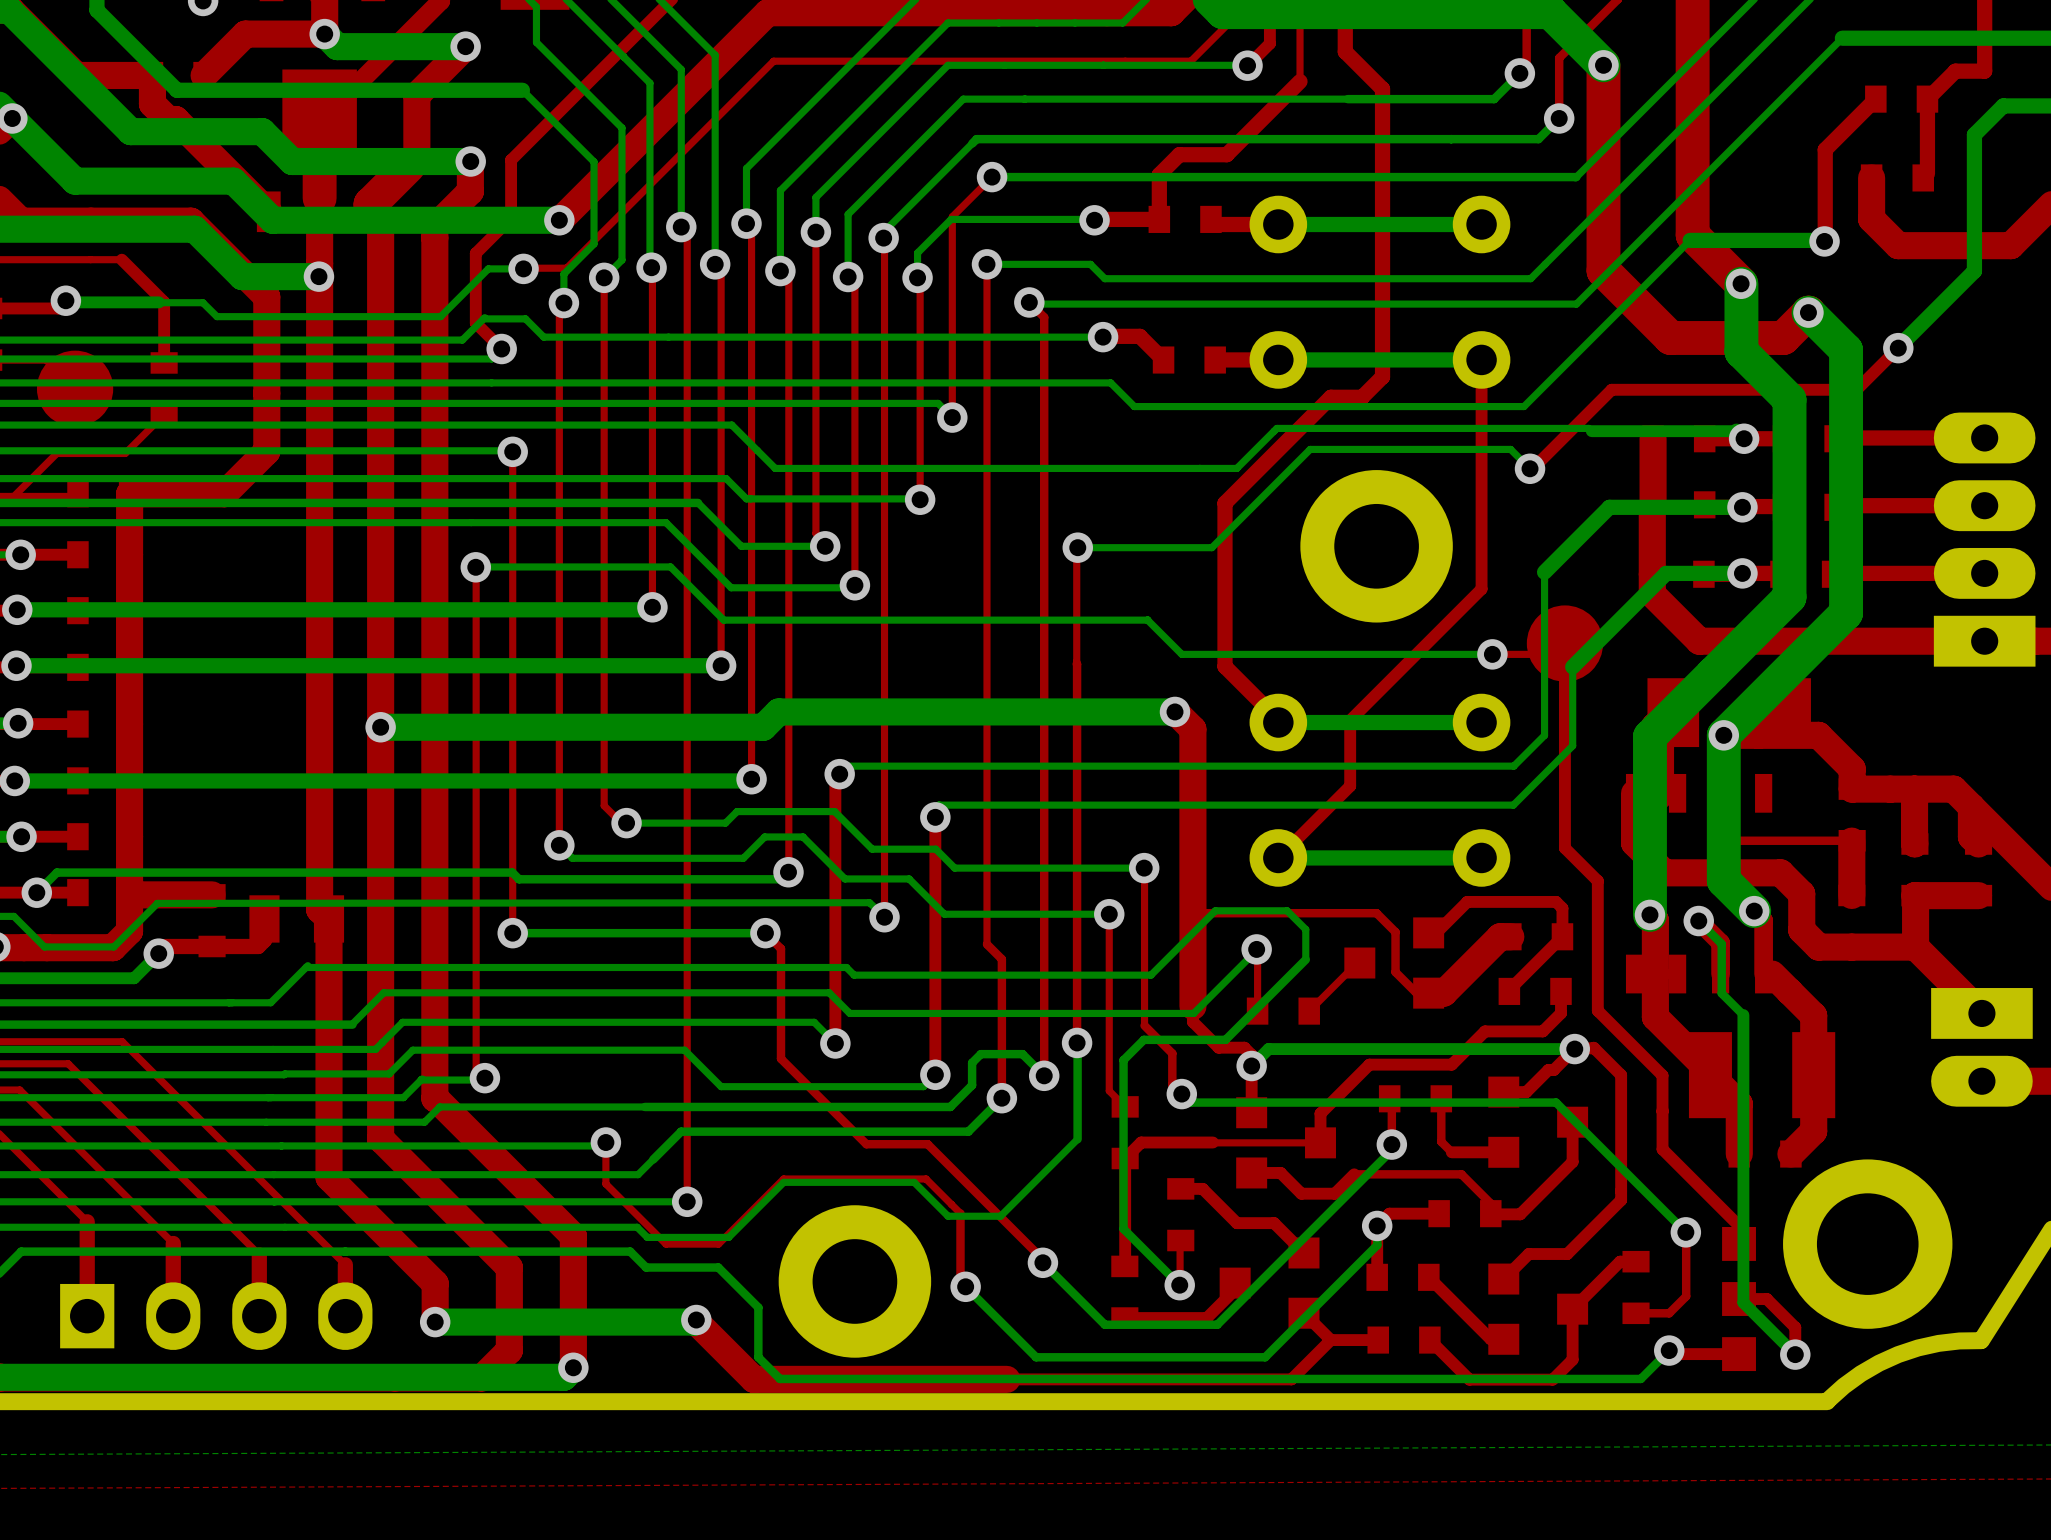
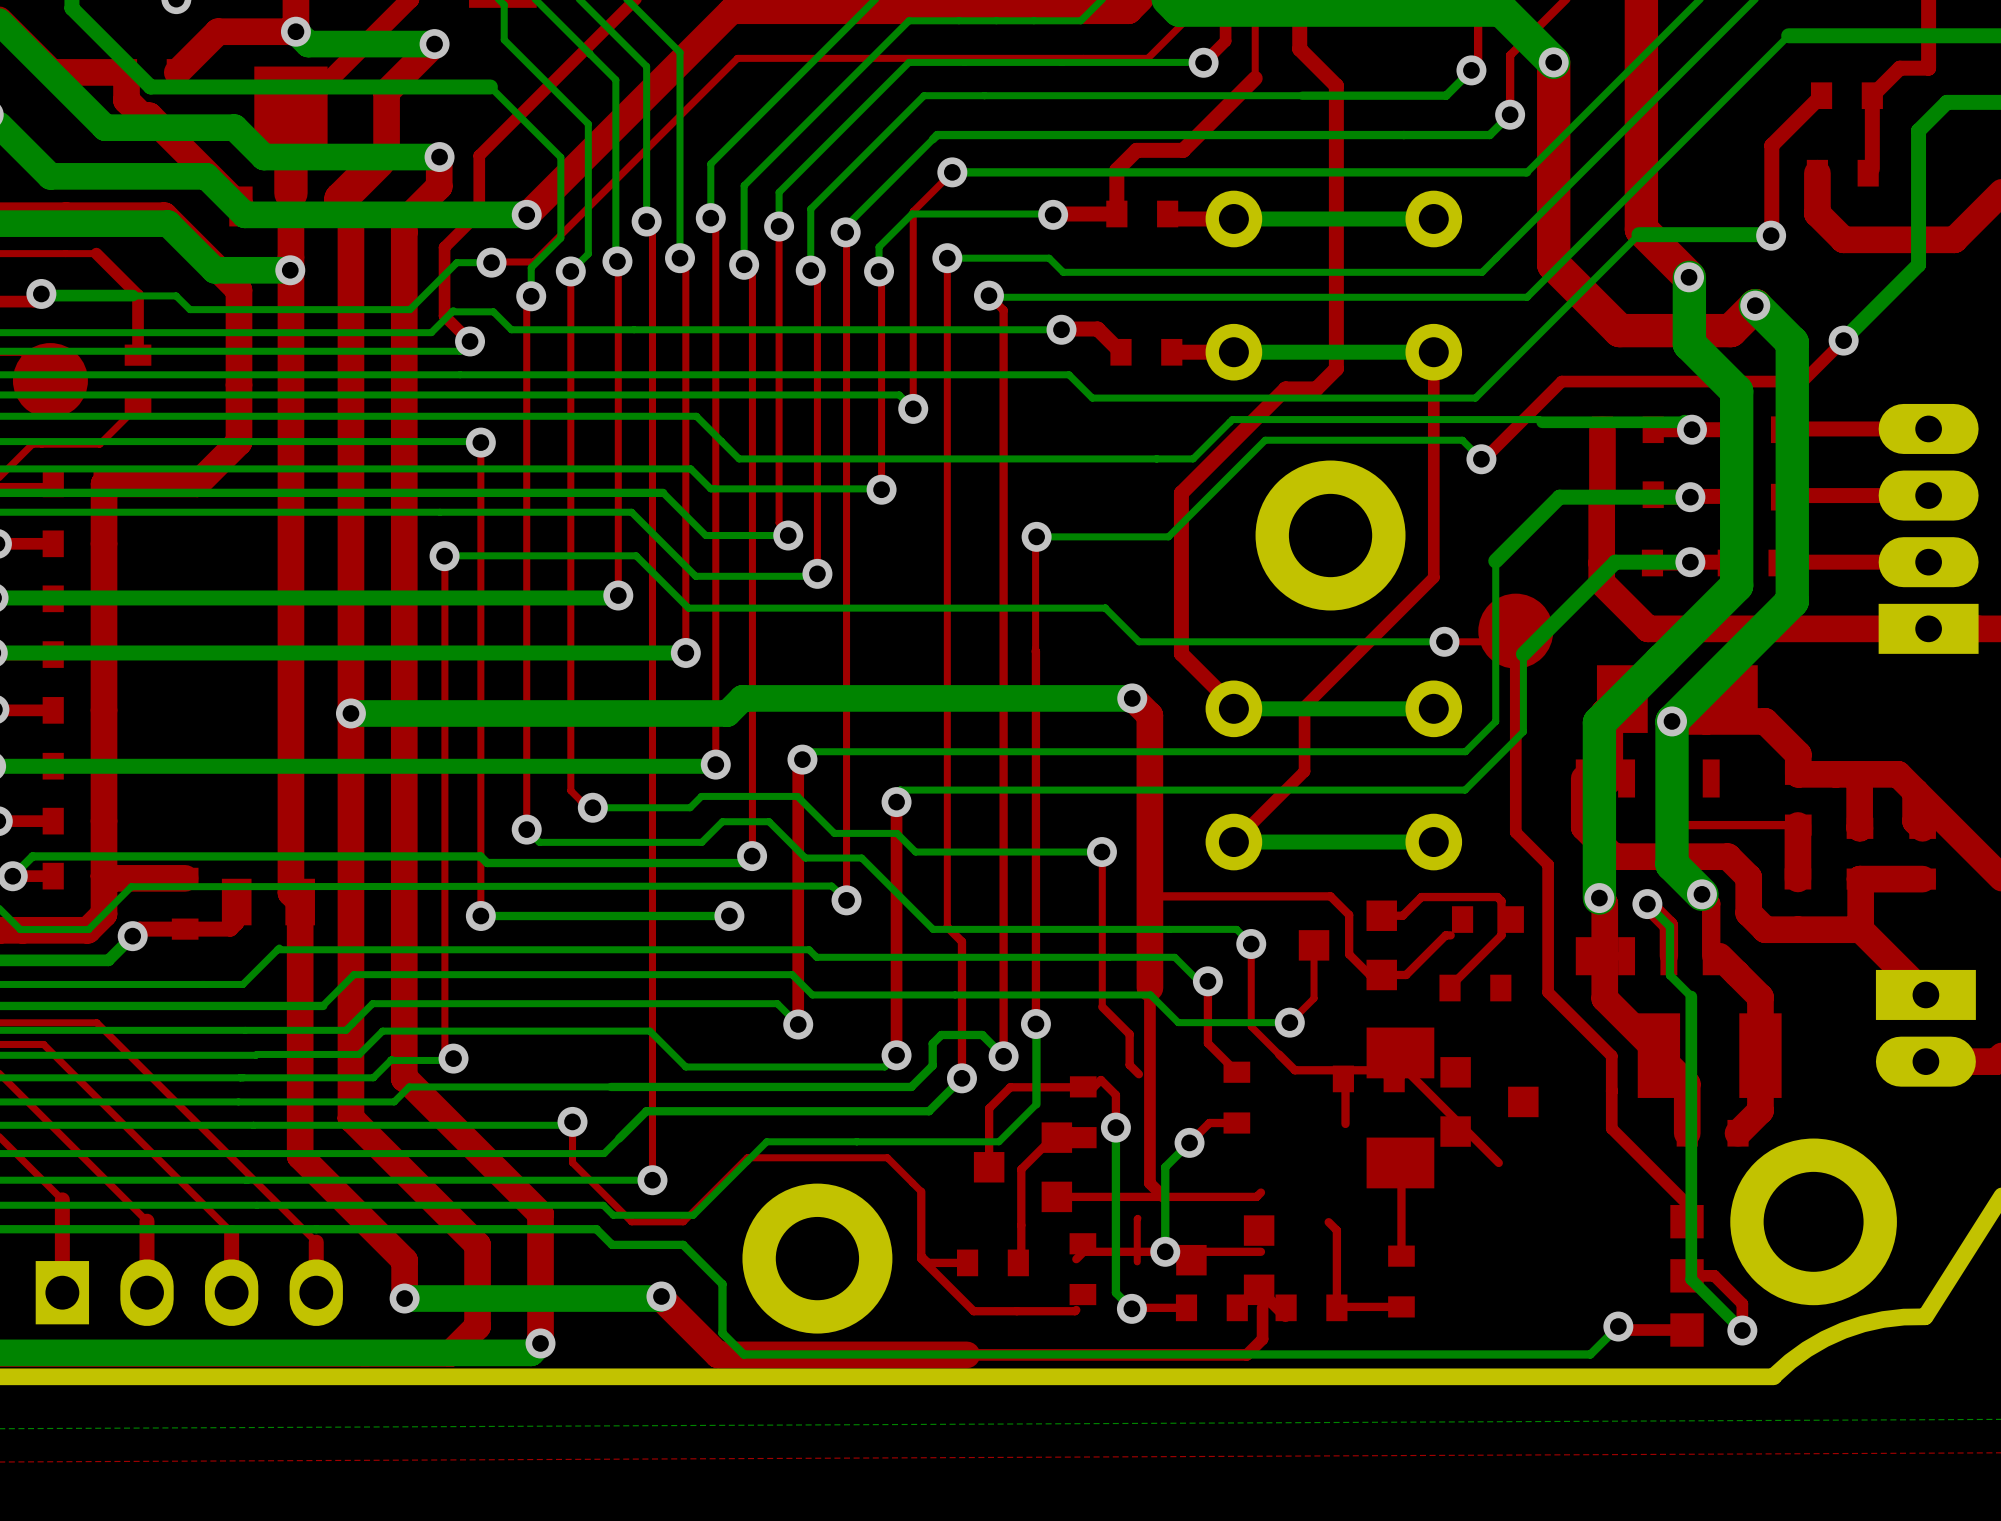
bottom track: (737, 858) (743, 858) (764, 836) (803, 836) (845, 878) (909, 878) (944, 914) (1109, 914) -> (701, 842) (722, 821) (769, 821) (805, 858) (861, 858) (933, 929) (1236, 929) (1251, 944)
top track: (1109, 914) (1109, 1090) (1125, 1106) -> none
via: (1109, 914) -> none
top track: none -> (1381, 915) (1402, 915) (1421, 897) (1497, 897) (1501, 901) (1501, 935) (1450, 988)
top track: (1436, 932) (1467, 901) (1556, 901) (1562, 908) (1562, 936) (1509, 991) -> none
top track: (765, 933) (781, 948) (781, 1058) (866, 1144) (927, 1144) (1042, 1259) (1042, 1262) -> none
top track: (1510, 936) (1500, 936) (1443, 993) -> (1450, 935) (1445, 935) (1406, 974) (1396, 974)
top track: (1256, 949) (1257, 1011) -> none
bottom track: (1256, 949) (1193, 1013) -> (1289, 1022) (1178, 1022) (1150, 994)
via: (1256, 949) -> none
top track: none -> (1251, 944) (1251, 1026) (1279, 1054)
via: none -> (1251, 944)
top track: (1357, 963) (1309, 1011) -> none
top track: none -> (1314, 945) (1314, 998) (1289, 1022)
bottom track: (1150, 975) (1215, 910) (1287, 910) (1305, 929) (1305, 959) (1225, 1039) (1143, 1039) (1123, 1060) (1123, 1228) (1179, 1285) -> (1108, 957) (1174, 957) (1198, 981) (1207, 981)
part position: (1535, 991) -> (1475, 988)
top track: (1560, 991) (1560, 1013) (1542, 1031) (1485, 1031) (1451, 1064) (1369, 1064) (1320, 1113) (1320, 1142) (1213, 1142) -> none
top track: none -> (1207, 981) (1207, 1043) (1236, 1072)
via: none -> (1207, 981)
part: (1283, 1011) -> none
top track: (1192, 1021) (1218, 1047) (1244, 1047) (1251, 1054) (1251, 1112) -> (1149, 1003) (1149, 1183) (1163, 1196)
via: none -> (1289, 1022)
top track: (1593, 1047) (1621, 1075) (1621, 1200) (1567, 1254) (1528, 1254) (1503, 1279) -> none
top track: (1594, 1048) (1575, 1048) (1553, 1070) (1548, 1070) (1526, 1092) (1503, 1092) -> none
bottom track: (1574, 1049) (1268, 1049) (1251, 1066) -> none
via: (1574, 1049) -> none
via: (1251, 1066) -> none
top track: none -> (1400, 1052) (1400, 1064) (1498, 1162)
top track: none -> (1400, 1052) (1383, 1070) (1294, 1070) (1279, 1054)
bottom track: (1181, 1094) (1190, 1102) (1556, 1102) (1685, 1232) -> none
via: (1181, 1094) -> none
part footprint: [1236, 1097, 1336, 1189] -> [1223, 1061, 1251, 1134]
top track: (1441, 1098) (1441, 1141) (1451, 1152) (1503, 1152) -> none
top track: (1572, 1122) (1572, 1161) (1520, 1214) (1491, 1214) (1490, 1203) (1461, 1174) (1354, 1174) (1334, 1193) (1301, 1193) (1280, 1172) (1251, 1172) -> none
bottom track: (1077, 1124) (1077, 1139) (1000, 1216) (948, 1216) (914, 1182) (783, 1182) -> (1036, 1104) (998, 1141) (766, 1141) (747, 1161)
part: none -> (1400, 1107)
top track: (1212, 1142) (1141, 1142) (1125, 1158) (1125, 1266) -> none
top track: none -> (1236, 1123) (1209, 1123) (1189, 1142)
bottom track: (1391, 1144) (1391, 1150) (1217, 1324) (1104, 1324) (1042, 1262) -> none
via: (1391, 1144) -> none
top track: none -> (1115, 1127) (1115, 1094) (1100, 1080) (1093, 1087) (1010, 1087) (989, 1108) (989, 1167)
bottom track: none -> (1115, 1127) (1115, 1292) (1131, 1308)
via: none -> (1115, 1127)
top track: none -> (1056, 1137) (1052, 1137) (1021, 1169) (1021, 1259) (1018, 1262)
bottom track: none -> (1189, 1142) (1165, 1167) (1165, 1251)
via: none -> (1189, 1142)
top track: none -> (1402, 1145) (1400, 1162) (1401, 1256)
top track: (1180, 1188) (1202, 1188) (1236, 1223) (1274, 1223) (1303, 1252) -> none
top track: (1439, 1213) (1389, 1213) (1377, 1225) (1376, 1276) -> none
part: (1464, 1213) -> none
part: (1180, 1214) -> none
top track: none -> (1260, 1192) (1256, 1196) (1056, 1196)
bottom track: (1377, 1225) (1377, 1245) (1265, 1357) (1036, 1357) (965, 1286) -> none
via: (1377, 1225) -> none
via: (1685, 1232) -> none
top track: (1686, 1232) (1686, 1296) (1669, 1313) (1636, 1313) -> none
top track: none -> (1328, 1222) (1336, 1230) (1336, 1307) (1401, 1306)
top track: (1636, 1261) (1620, 1261) (1572, 1309) (1572, 1359) (1552, 1379) (1469, 1379) (1429, 1340) -> none
via: (1042, 1262) -> none
top track: none -> (1260, 1251) (1083, 1251) (1076, 1259)
part: (1403, 1277) -> none
top track: (1428, 1277) (1490, 1339) (1503, 1339) -> none
top track: none -> (921, 1256) (928, 1262) (967, 1262)
top track: (1235, 1283) (1235, 1289) (1206, 1318) (1124, 1318) -> none
part: none -> (992, 1262)
via position: (1179, 1285) -> (1165, 1251)
top track: none -> (926, 1263) (973, 1311) (1076, 1309)
via: (965, 1286) -> none
part: (1636, 1287) -> none
part: none -> (1401, 1281)
part rotation: 0° (1538, 1309) -> 180° (1023, 1167)
part position: (1538, 1309) -> (1023, 1167)
top track: none -> (1186, 1307) (1131, 1308)
part: none -> (1211, 1307)
part: none -> (1311, 1307)
via: none -> (1131, 1308)
top track: (1378, 1340) (1330, 1340) (1307, 1363) -> (1262, 1307) (1262, 1339)
part: (1404, 1340) -> none

